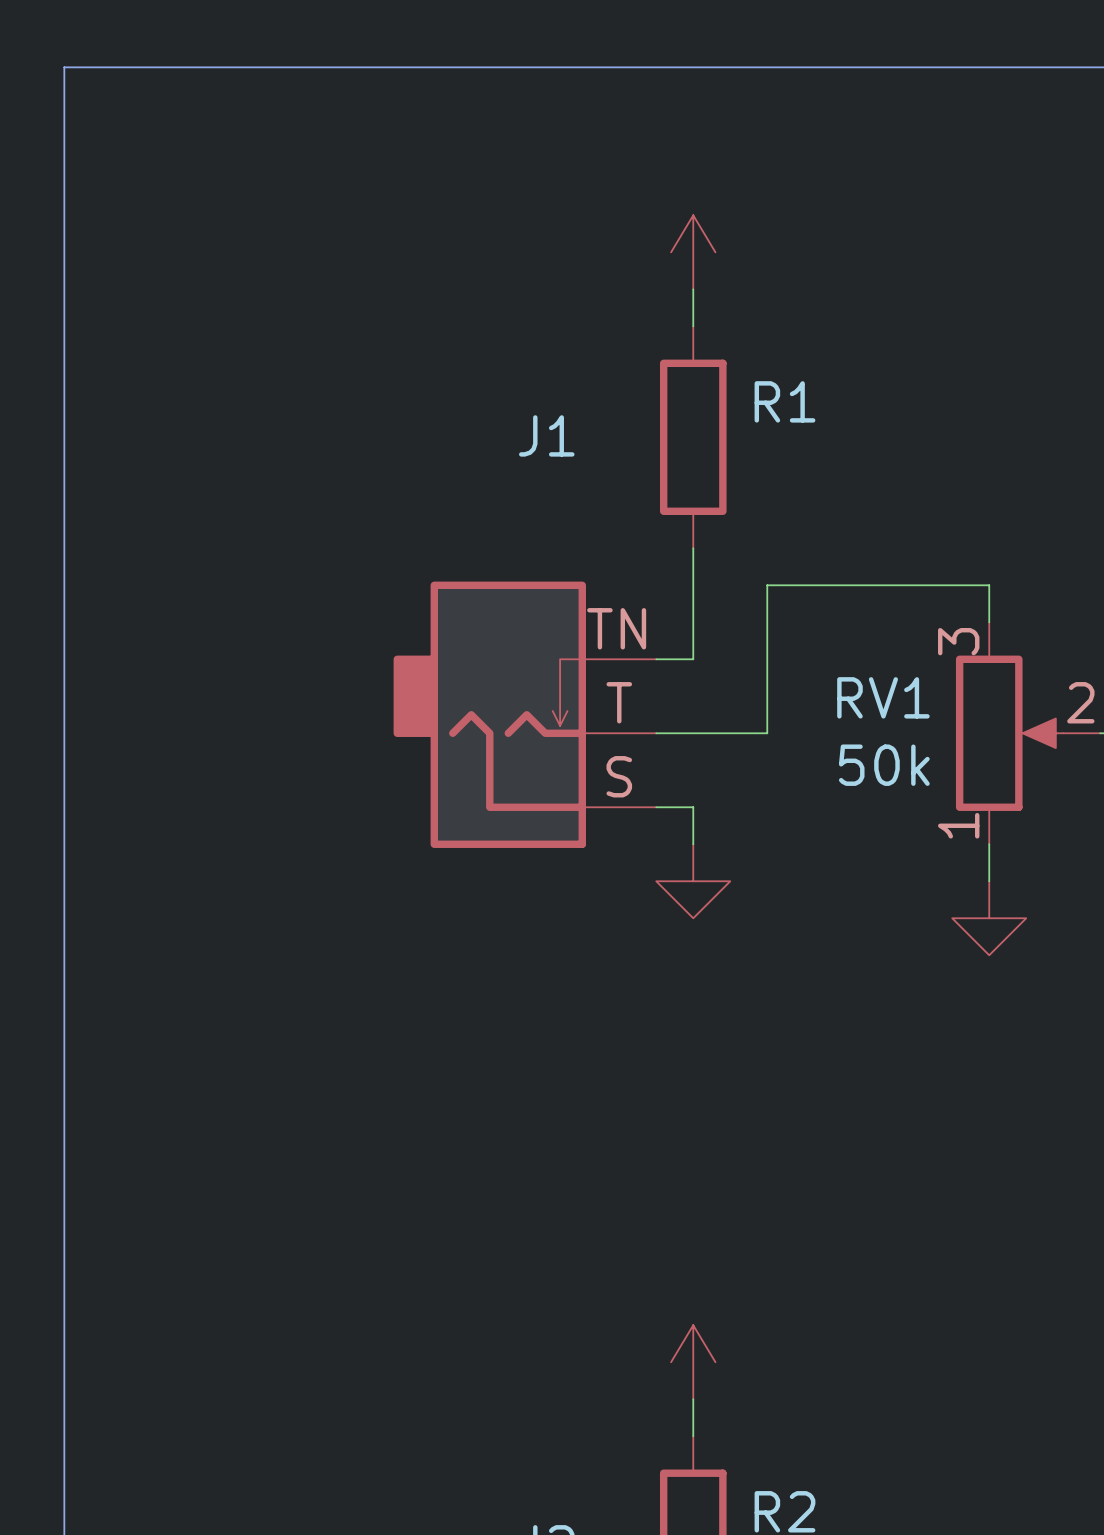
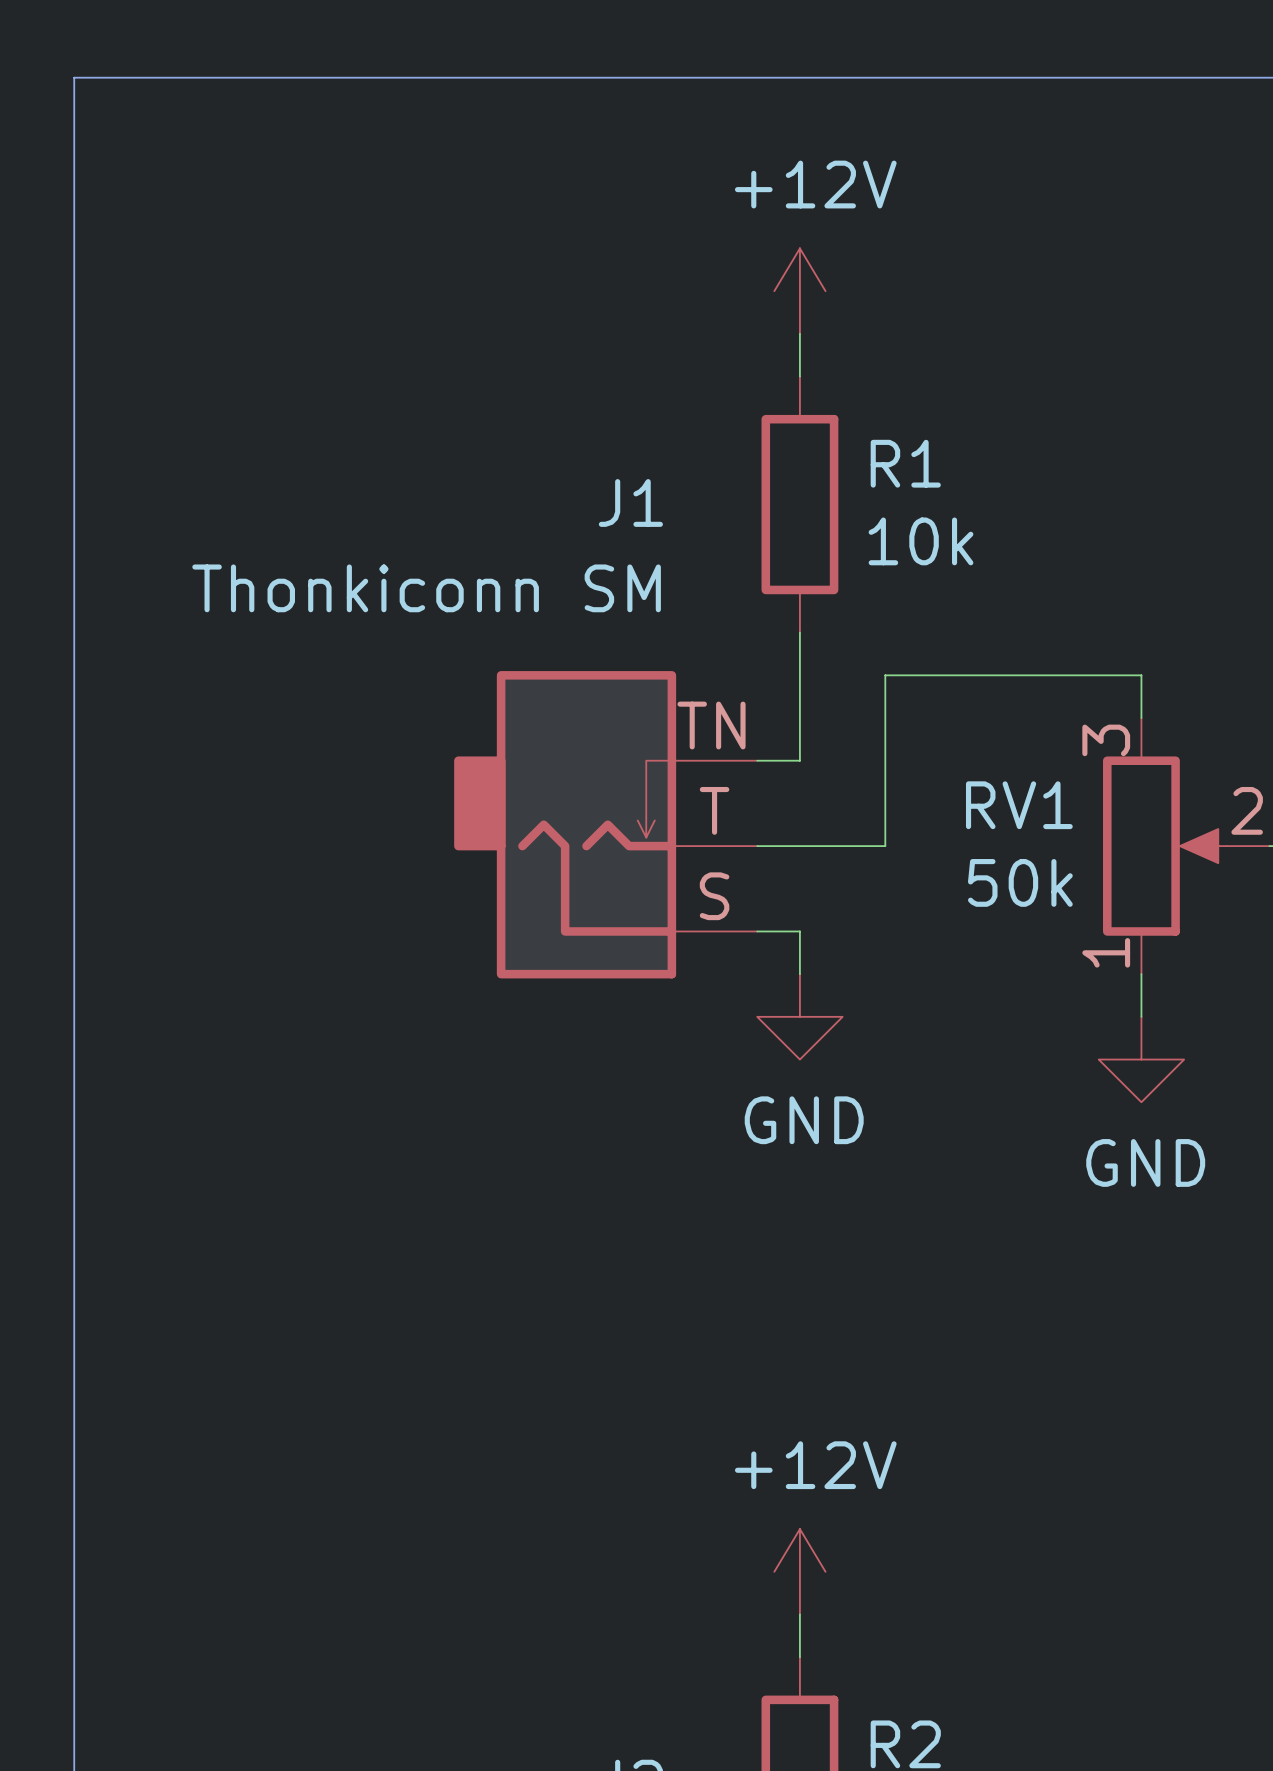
power symbol text: none -> +12V (815, 184)
R1 value: none -> 10k (921, 541)
J1 value: none -> Thonkiconn SM (426, 588)
power symbol text: none -> GND (804, 1120)
power symbol text: none -> GND (1145, 1162)
power symbol text: none -> +12V (815, 1465)

